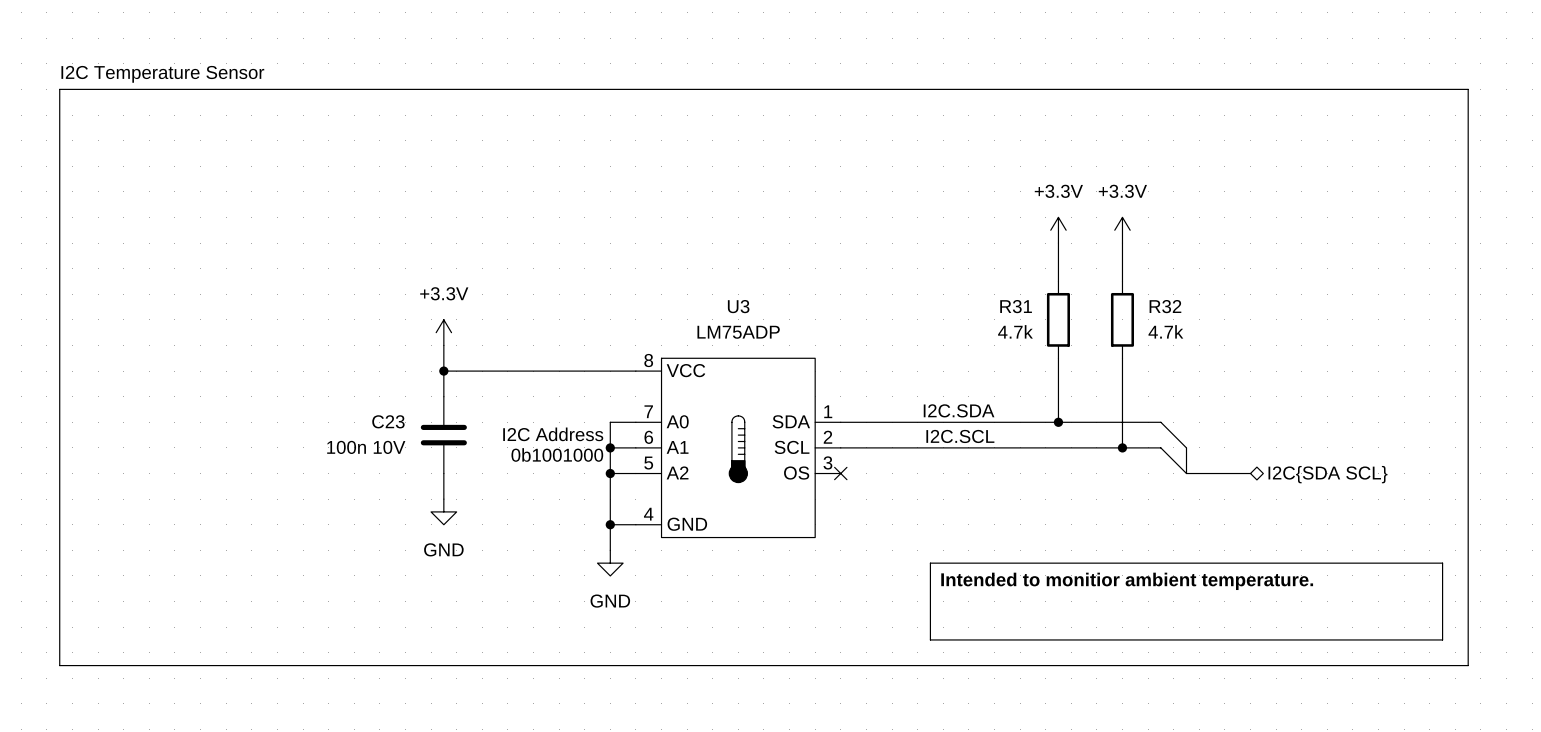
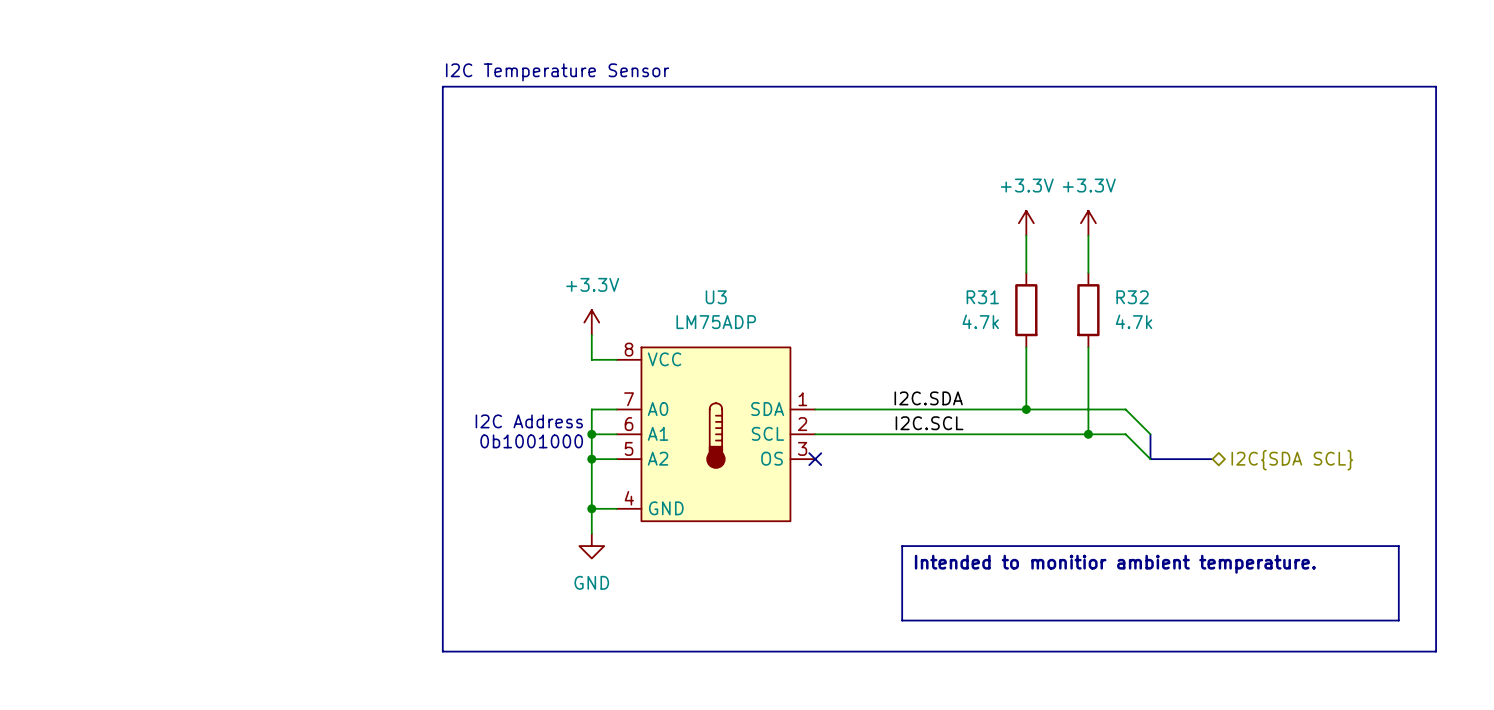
text: I2C Temperature Sensor (162, 74) -> none
text: none -> I2C Temperature Sensor (557, 72)
line: (456, 89) (59, 89) (59, 665) (1468, 665) (1468, 89) -> (442, 86) (442, 651) (1436, 651) (1436, 86) (1423, 86)
power symbol position: +3.3V (443, 332) -> +3.3V (591, 322)
wire: (443, 345) (443, 396) -> none
wire: (443, 371) (610, 371) -> (591, 334) (591, 359)
junction: (443, 371) -> none
C23: 100n 10V (443, 435) -> none
wire: (443, 473) (443, 499) -> none
power symbol: GND (443, 511) -> none

